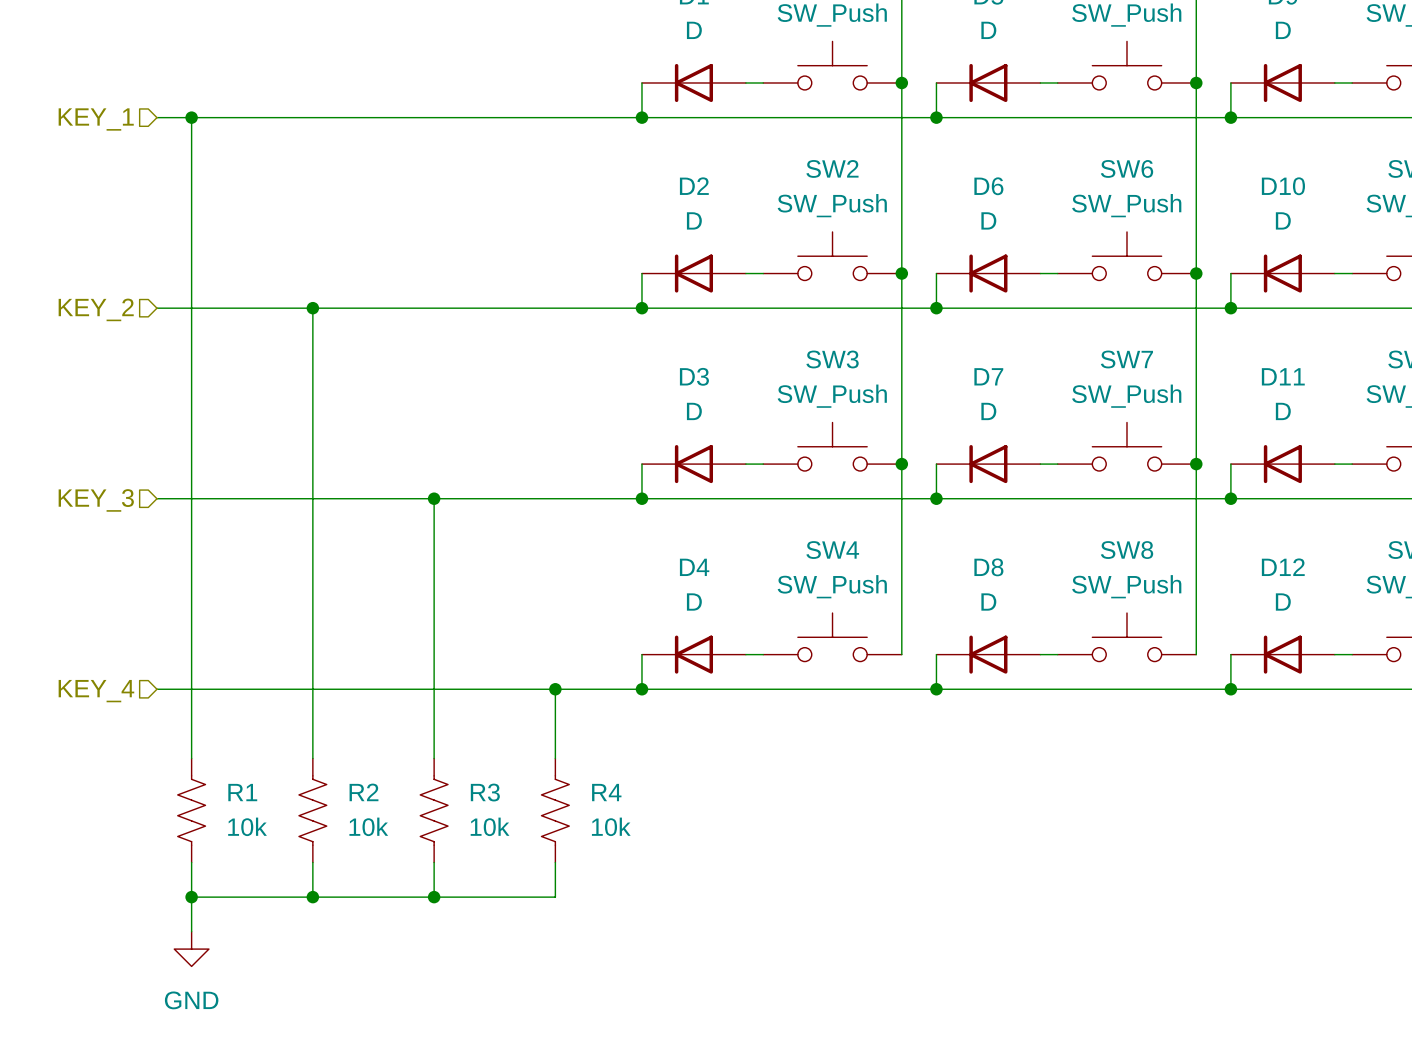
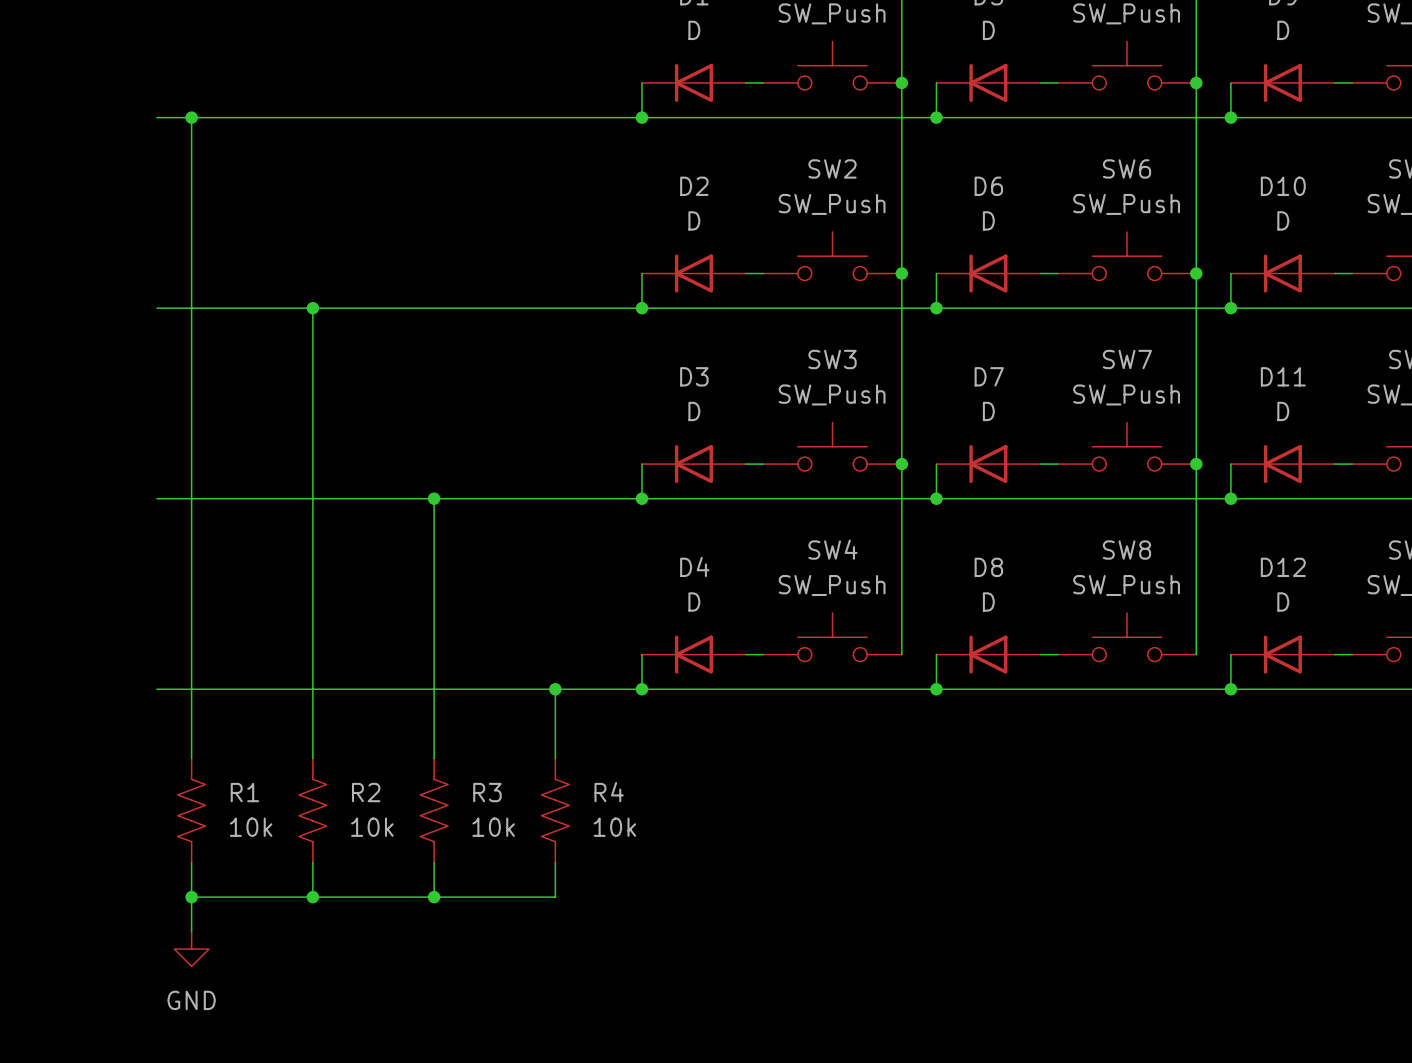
hierarchical label: KEY_1 (96, 119) -> none
hierarchical label: KEY_2 (96, 309) -> none
hierarchical label: KEY_3 (96, 500) -> none
hierarchical label: KEY_4 (96, 691) -> none

